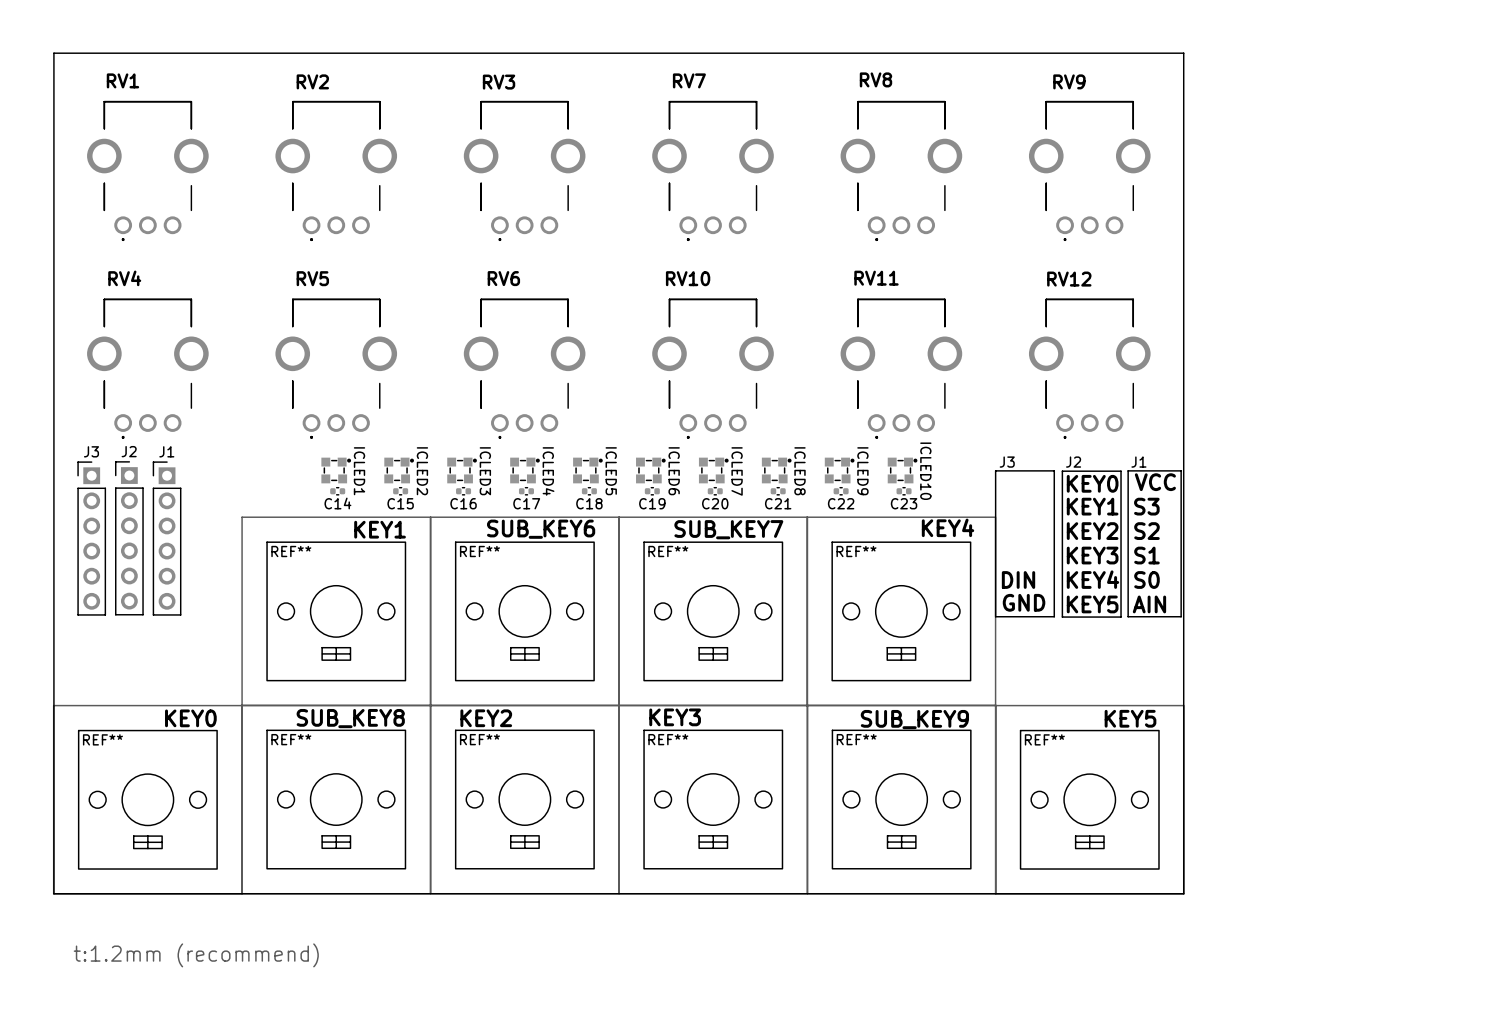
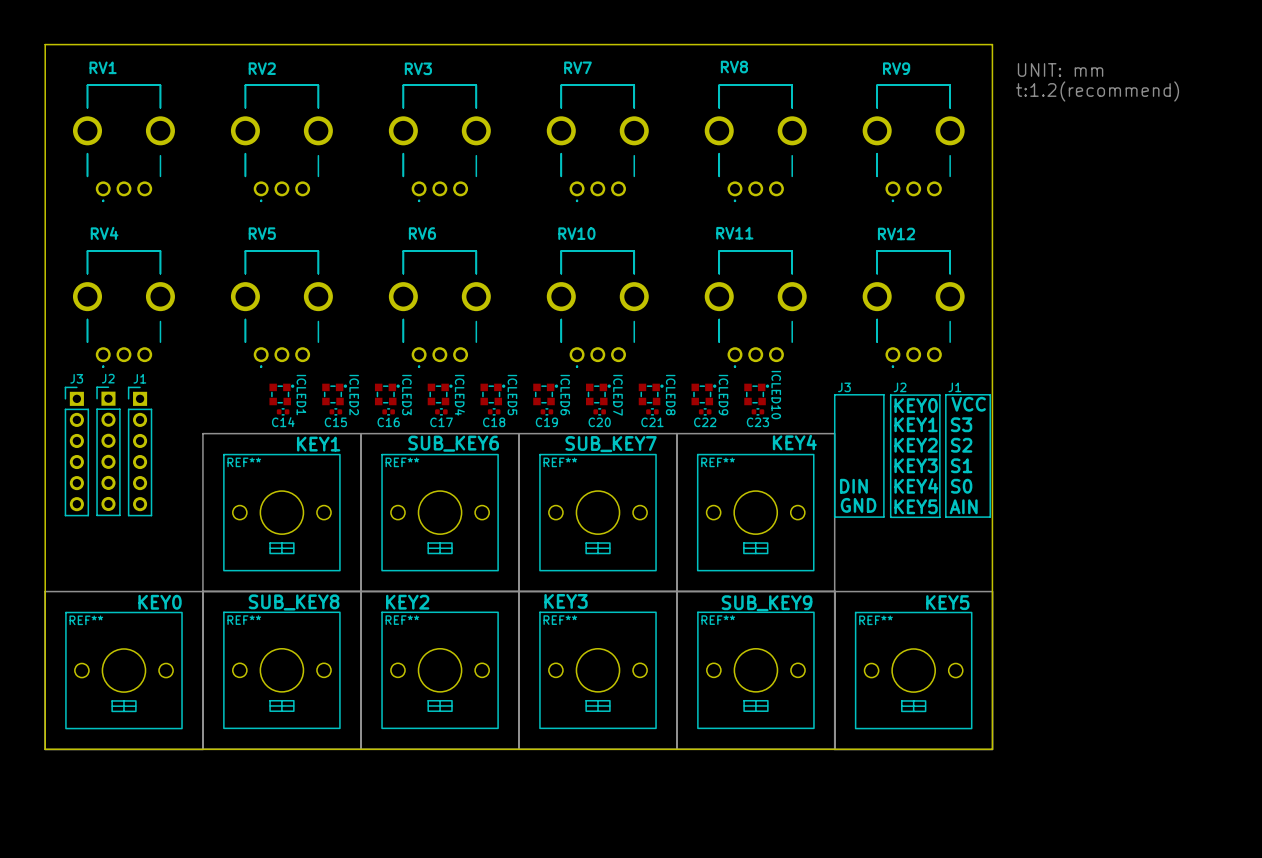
text: none -> UNIT: mm (1060, 69)
text: none -> t:1.2(recommend) (1097, 91)
text: t:1.2mm (recommend) (196, 955) -> none

